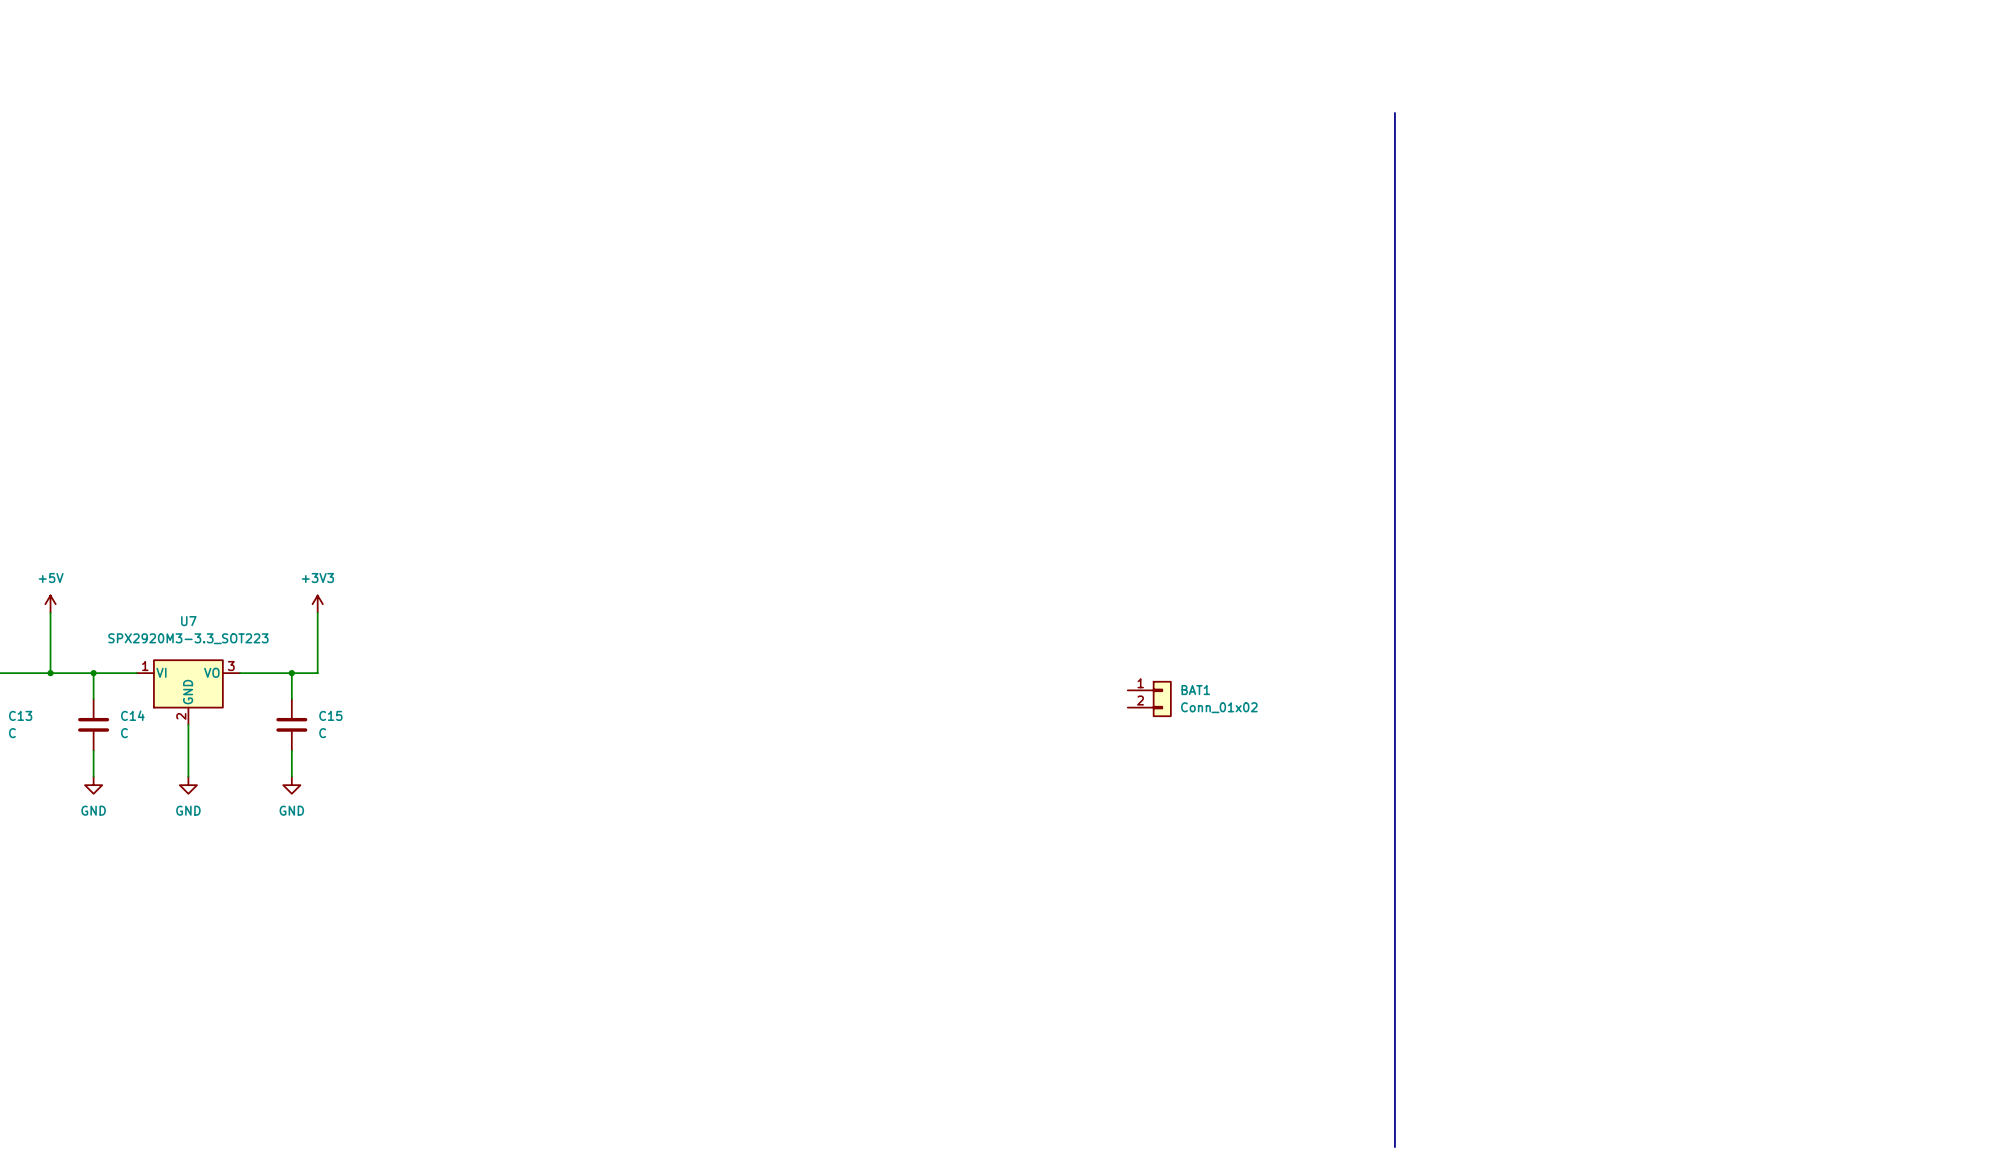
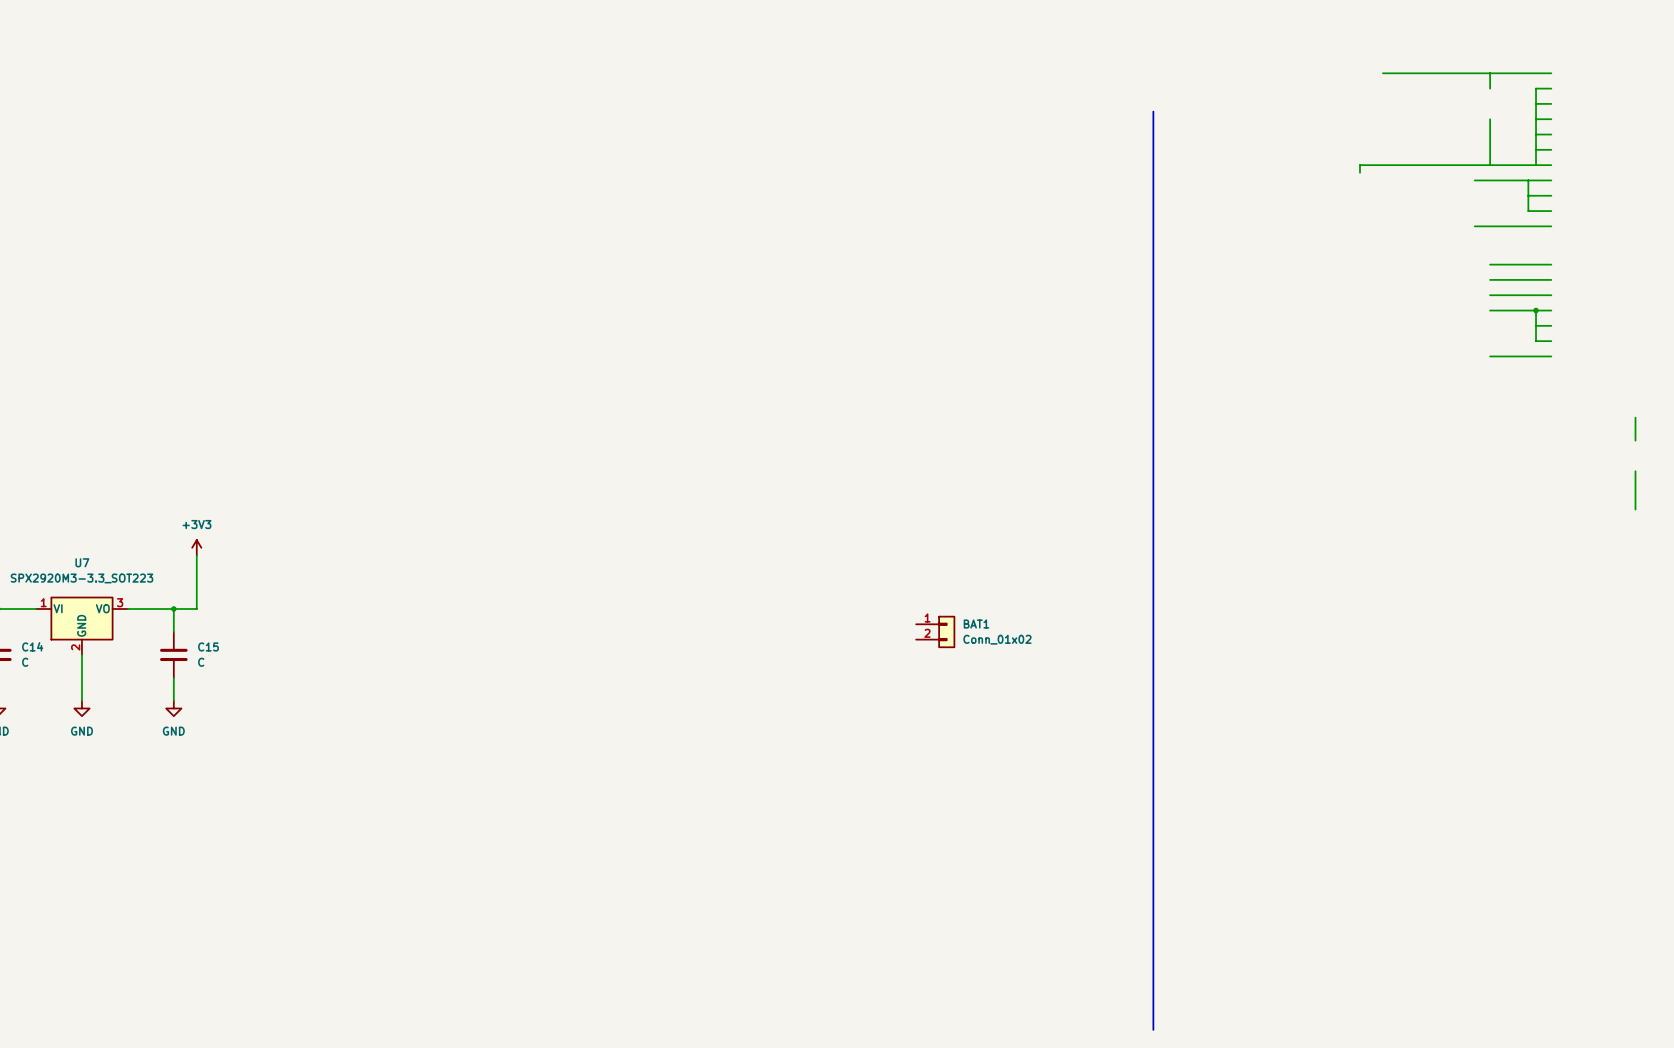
wire: none -> (1382, 73) (1551, 73)
wire: none -> (1490, 73) (1490, 88)
wire: none -> (1551, 88) (1536, 88) (1536, 165)
wire: none -> (1536, 103) (1551, 103)
wire: none -> (1490, 119) (1490, 165)
wire: none -> (1536, 119) (1551, 119)
wire: none -> (1536, 134) (1551, 134)
wire: none -> (1536, 149) (1551, 149)
wire: none -> (1551, 165) (1360, 165) (1360, 172)
wire: none -> (1474, 180) (1551, 180)
wire: none -> (1528, 180) (1528, 211) (1551, 211)
wire: none -> (1528, 195) (1551, 195)
wire: none -> (1474, 226) (1551, 226)
wire: none -> (1490, 264) (1551, 264)
wire: none -> (1490, 279) (1551, 279)
wire: none -> (1490, 295) (1551, 295)
wire: none -> (1490, 310) (1551, 310)
wire: none -> (1536, 310) (1536, 341) (1551, 341)
junction: none -> (1536, 310)
wire: none -> (1536, 325) (1551, 325)
wire: none -> (1490, 356) (1551, 356)
wire: none -> (1635, 417) (1635, 440)
wire: none -> (1635, 471) (1635, 509)

